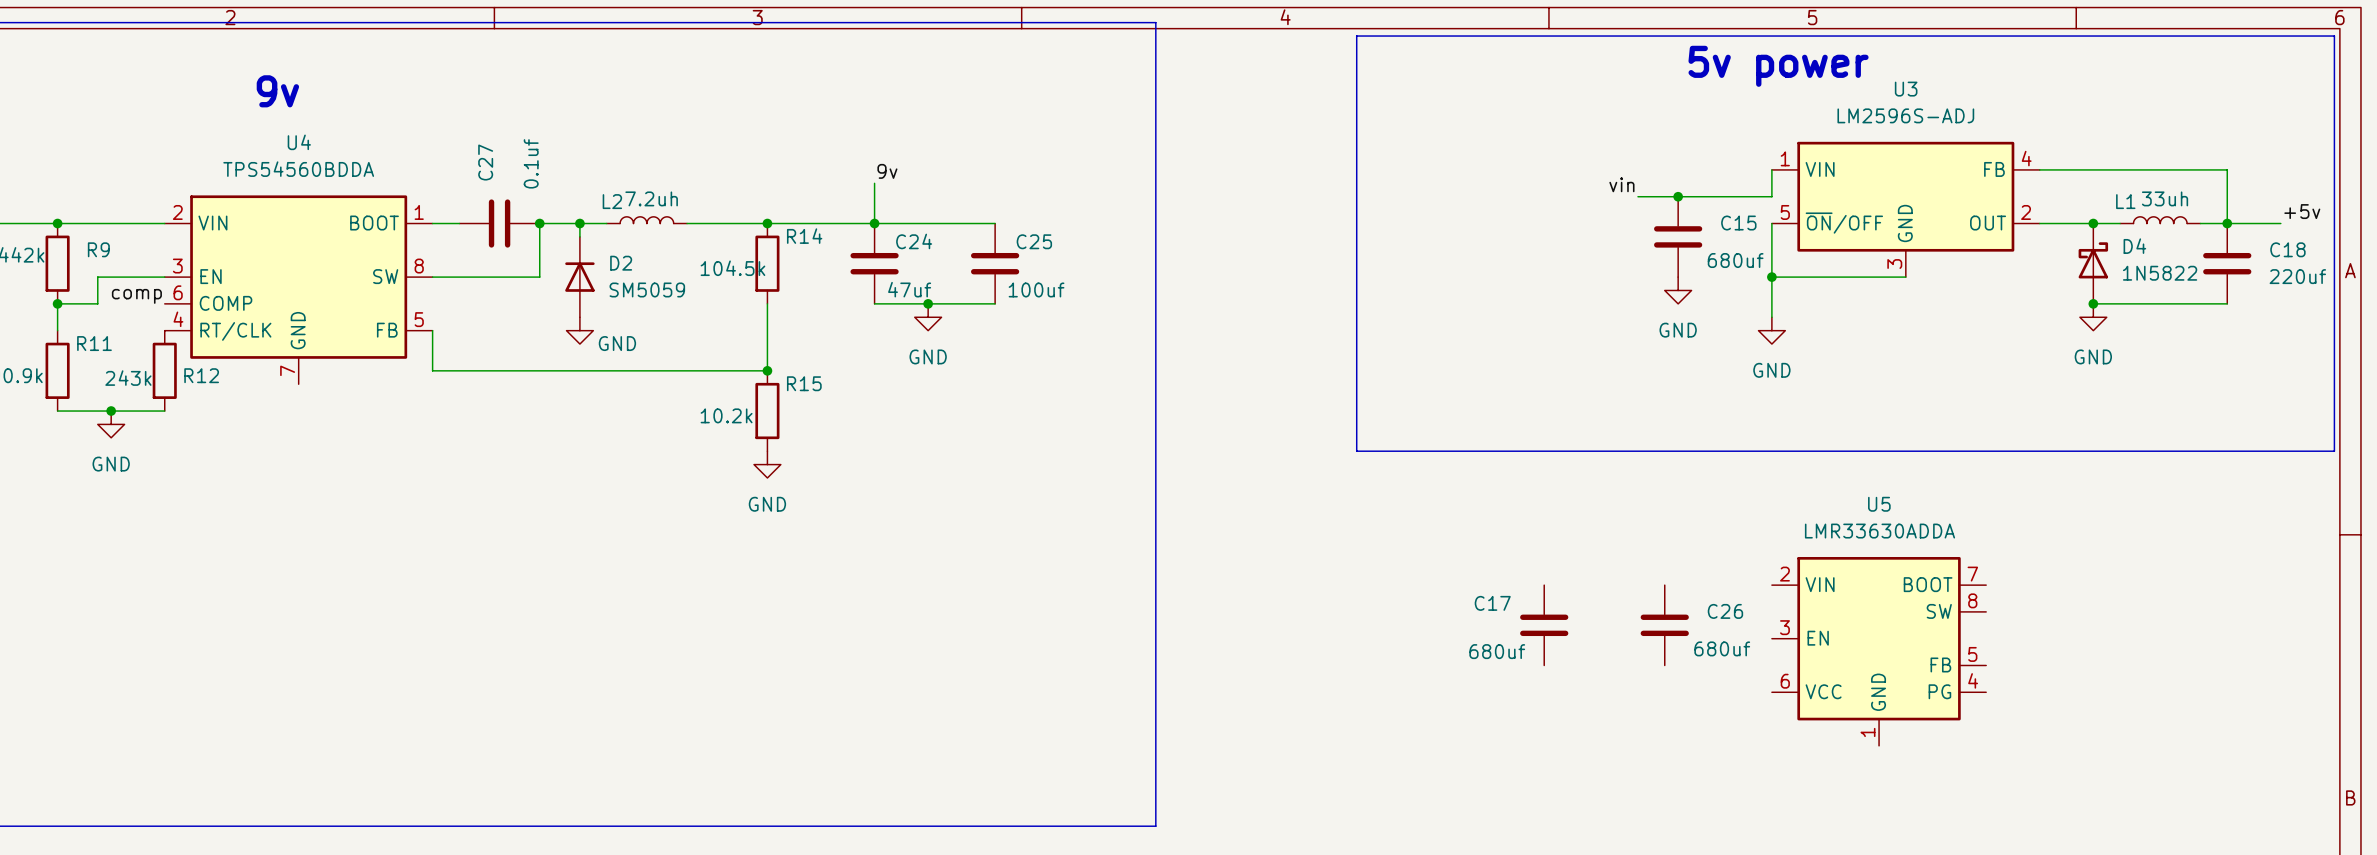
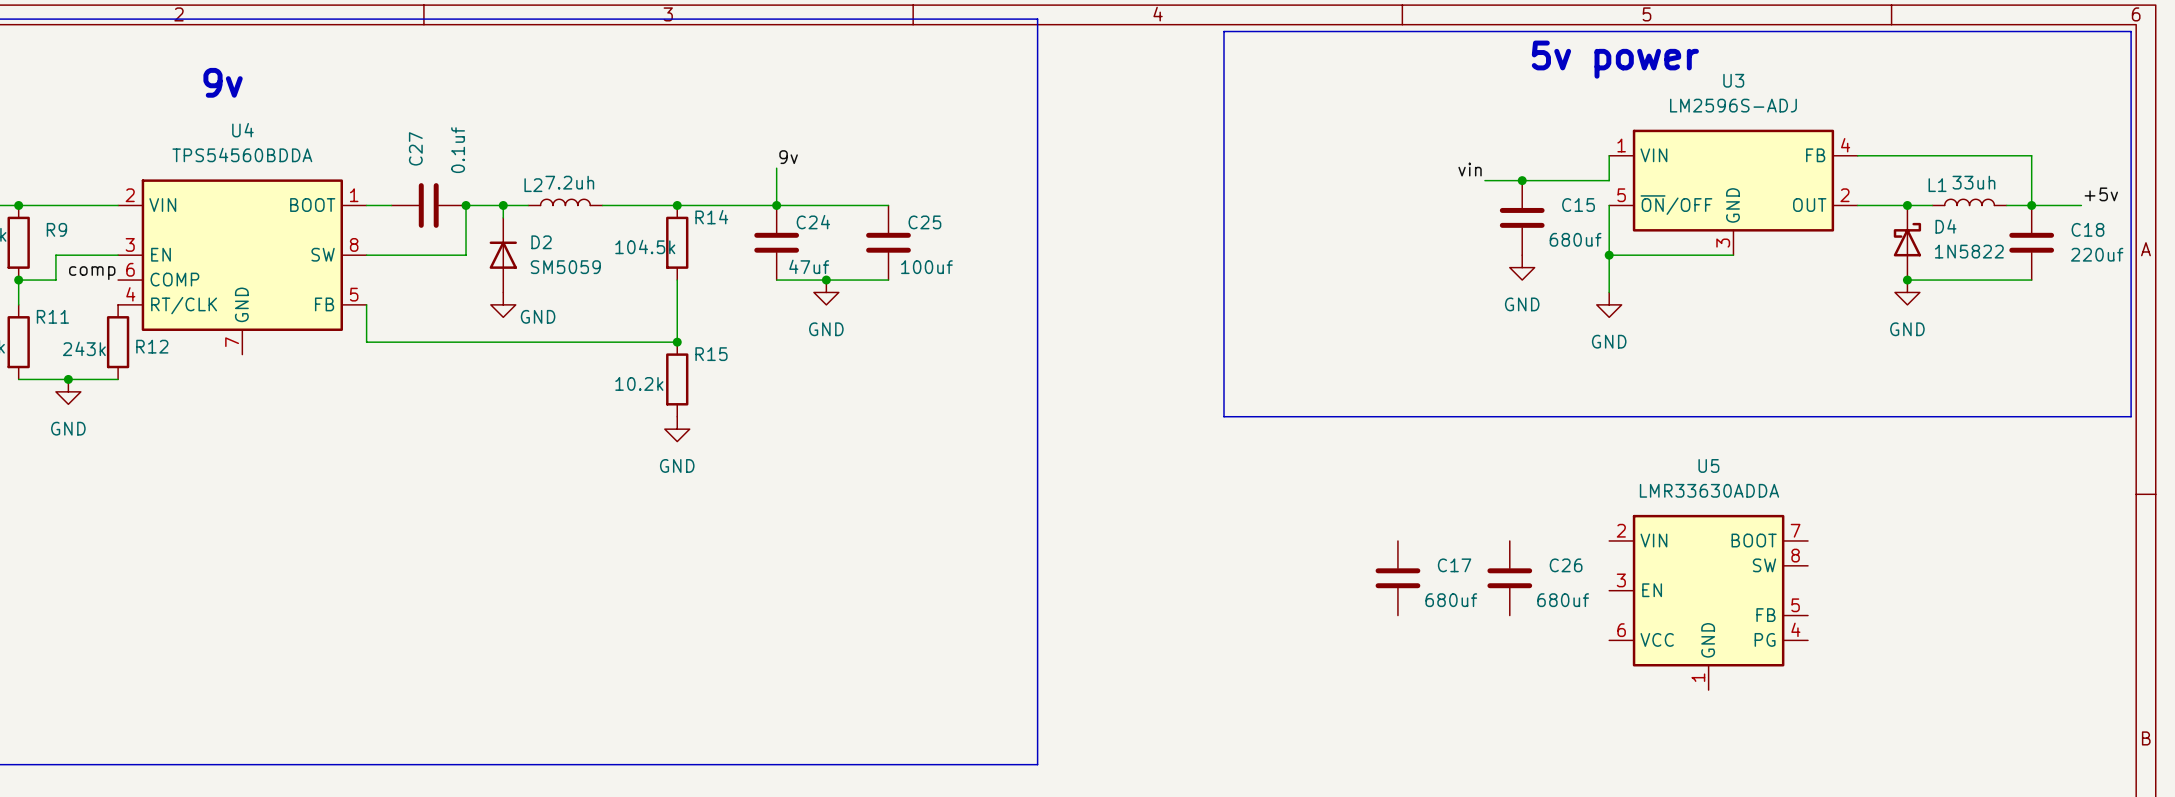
C17 name position: C17 (1492, 603) -> C17 (1454, 565)
C17 value position: 680uf (1497, 651) -> 680uf (1451, 600)

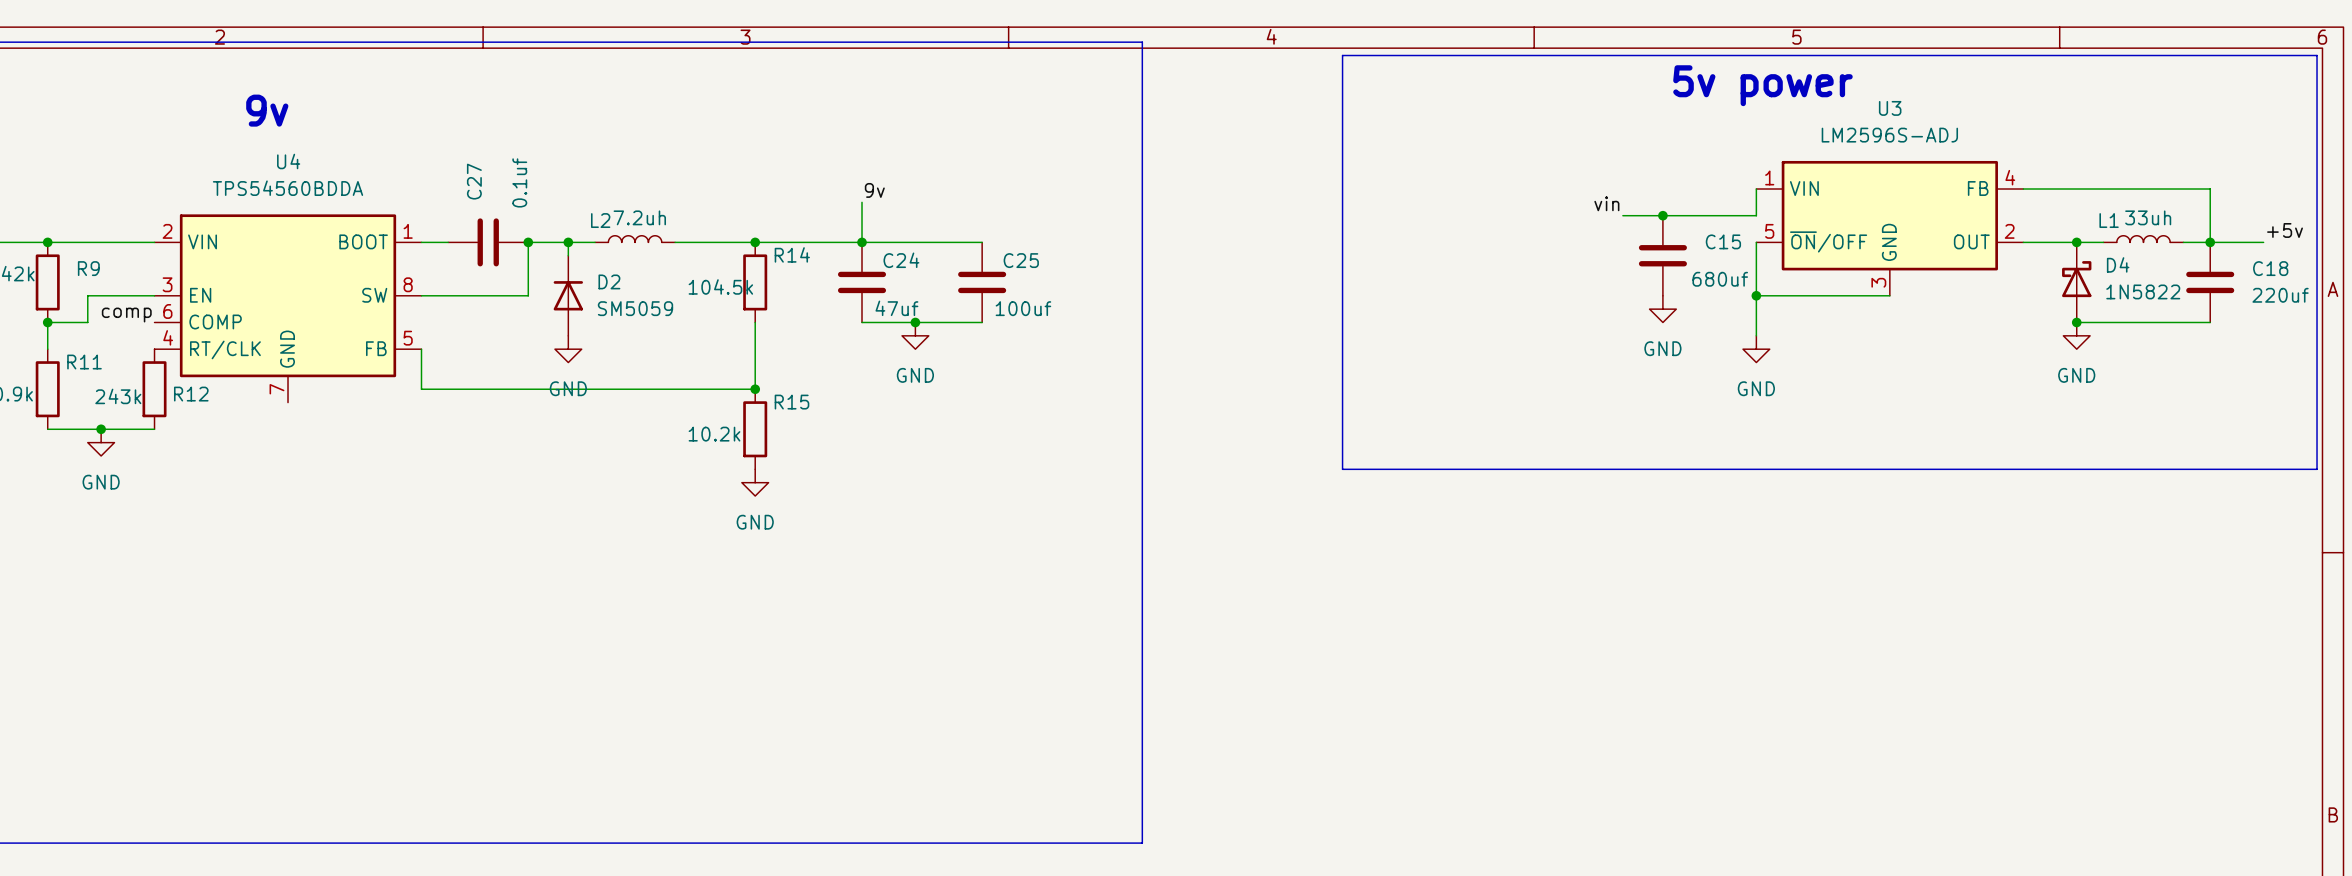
power symbol text position: GND (538, 316) -> GND (568, 388)
C17: 680uf (1397, 578) -> none
C26: 680uf (1509, 578) -> none
U5: LMR33630ADDA (1708, 602) -> none

